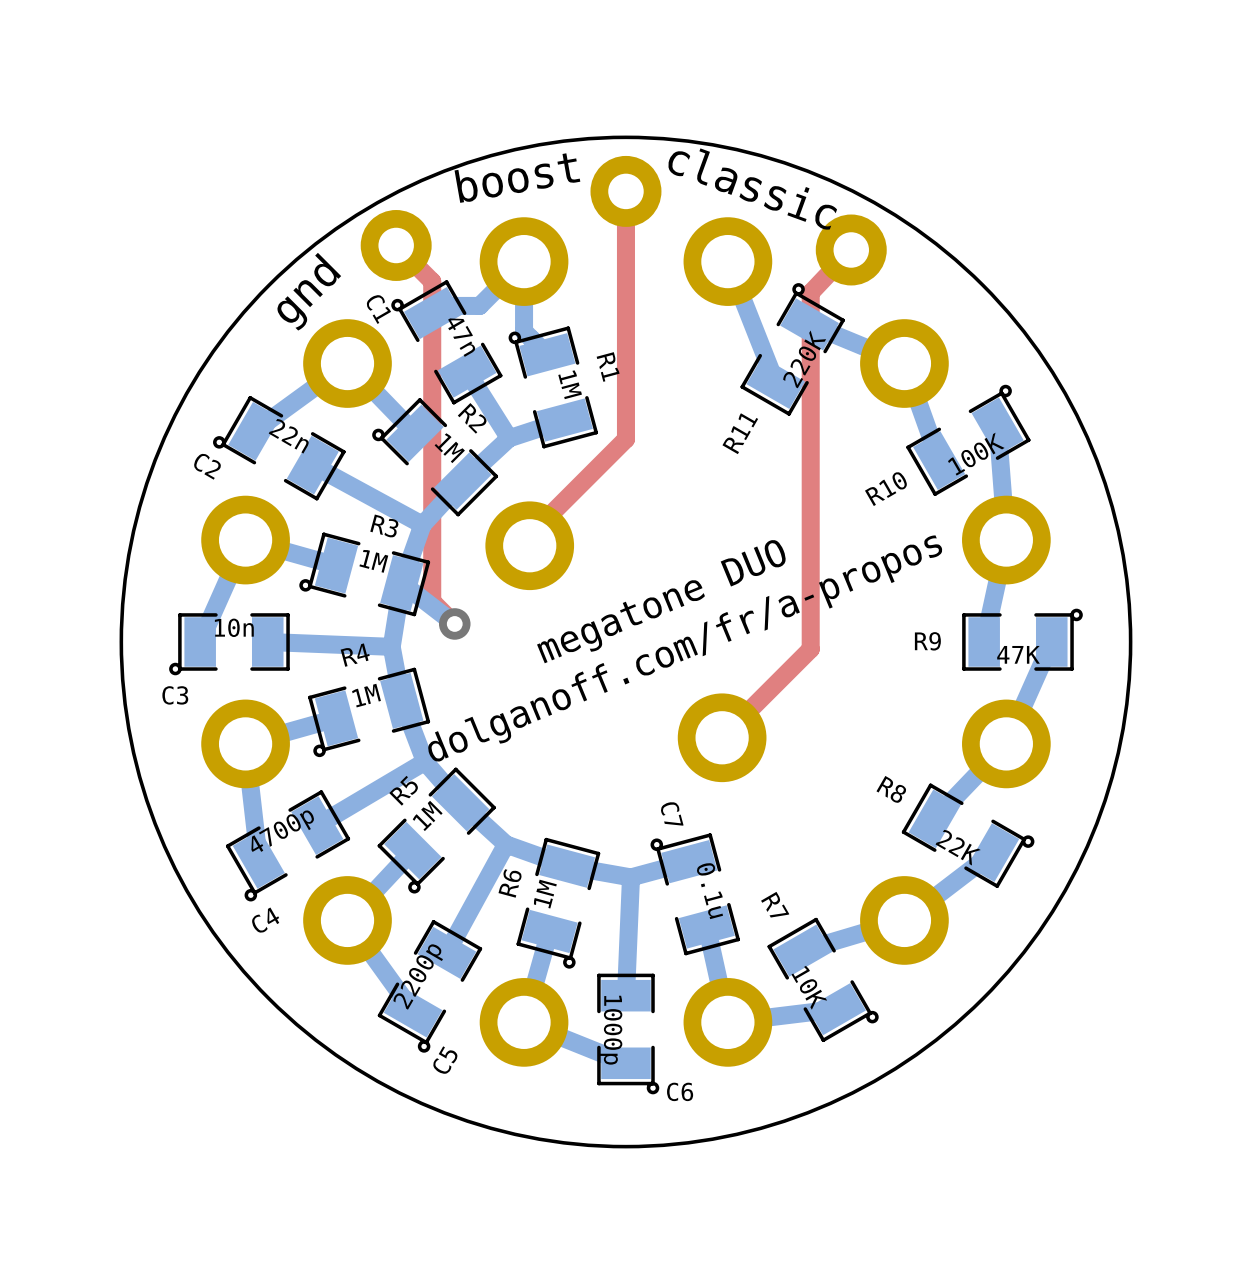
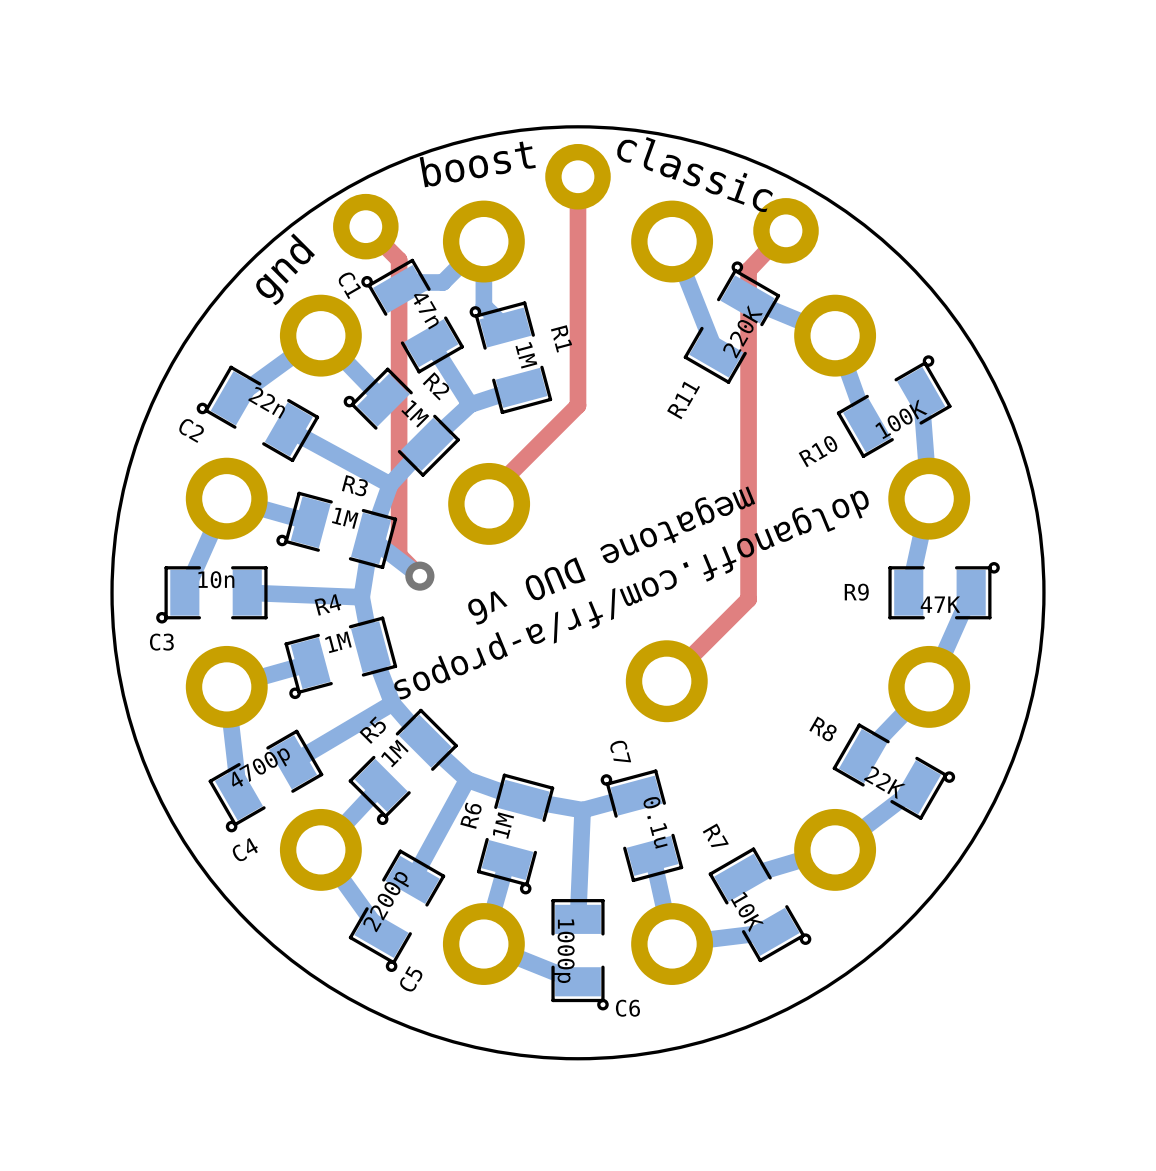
text: megatone DUO (661, 601) -> megatone DUO v6 (611, 555)
text rotation: 0° (685, 648) -> 180° (631, 594)

